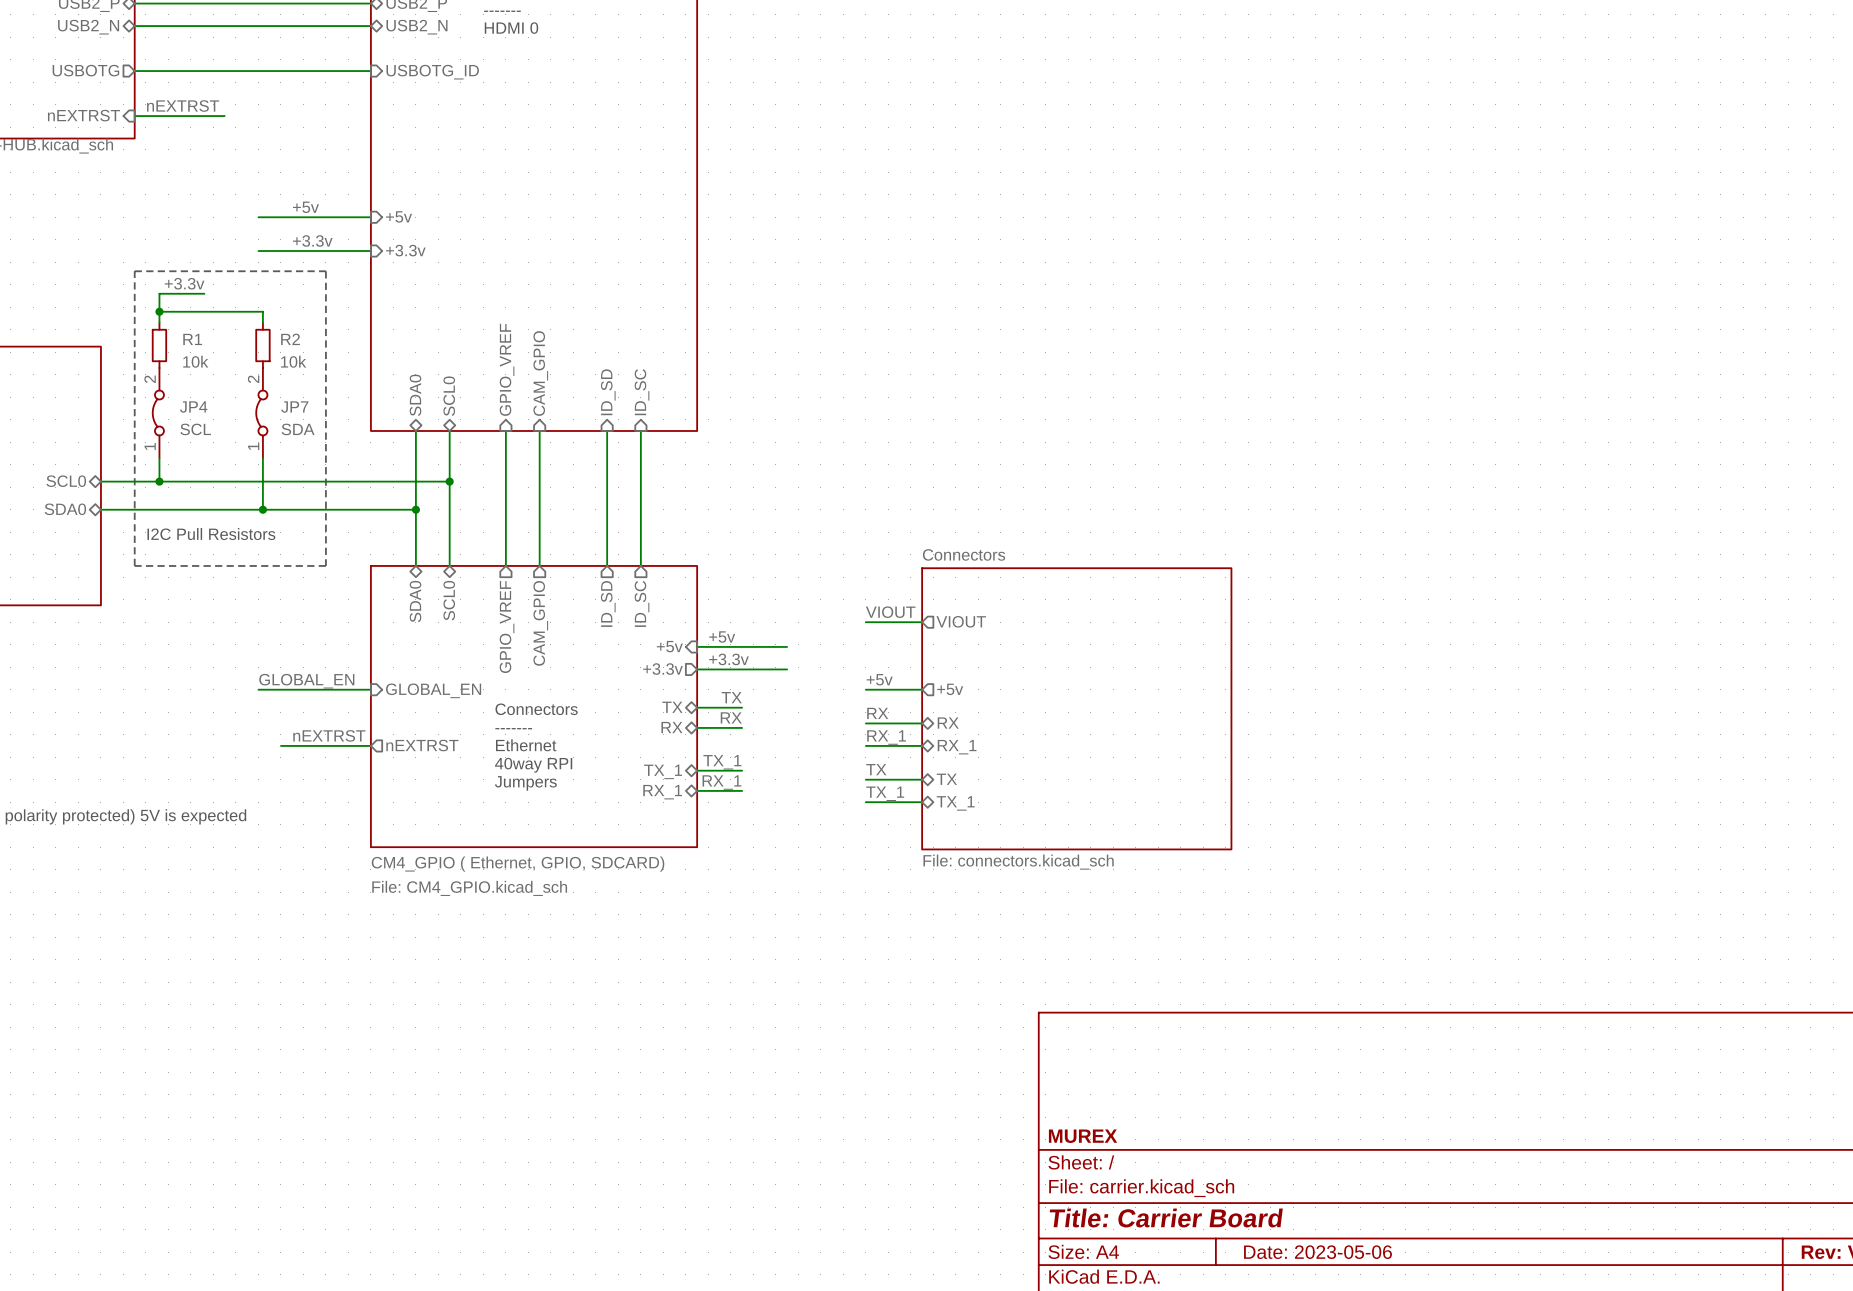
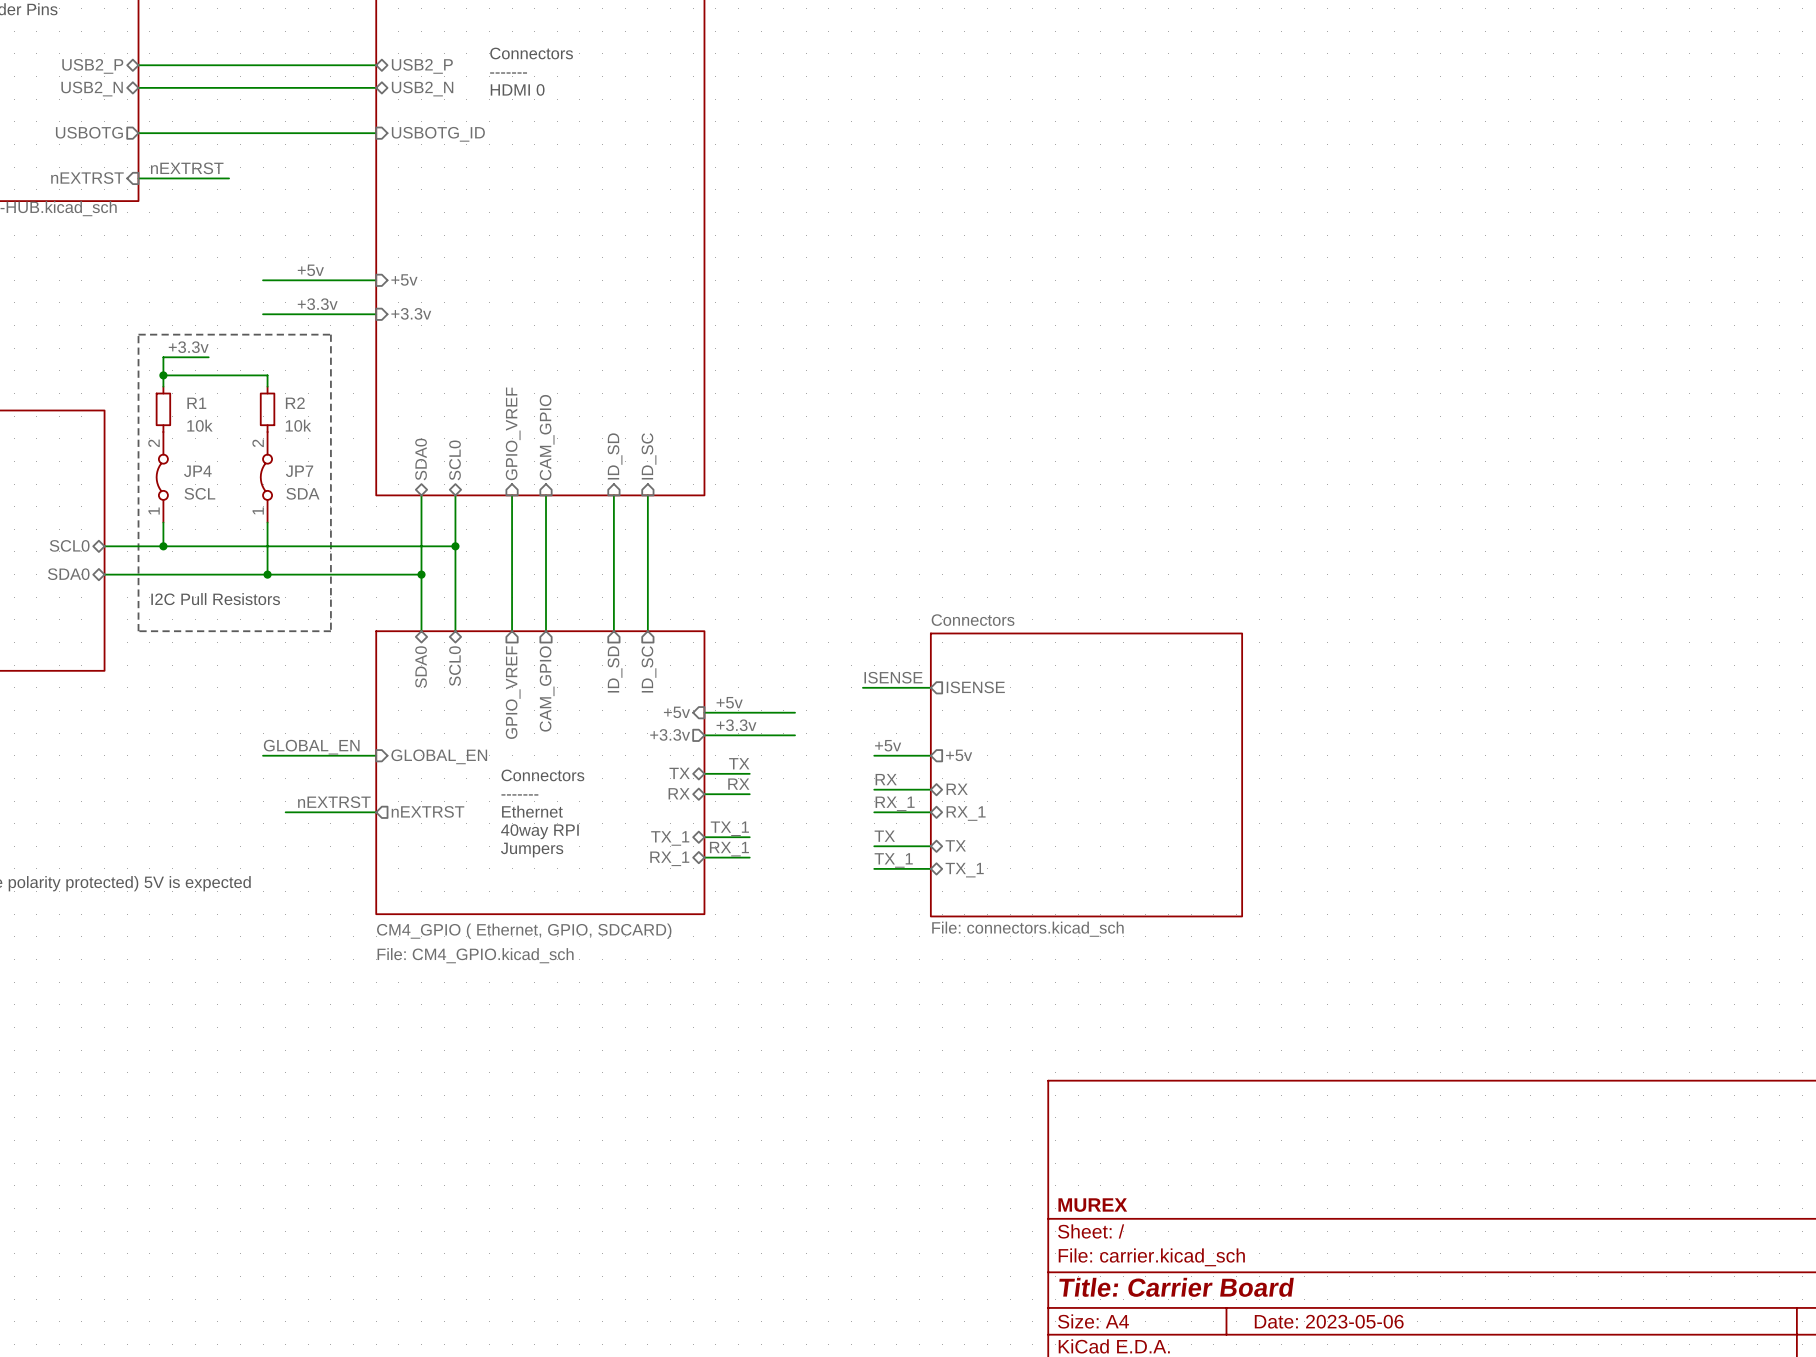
label: none -> ISENSE (893, 677)
label: VIOUT (890, 612) -> none
sheet pin: VIOUT (961, 621) -> ISENSE (975, 687)
wire: none -> (862, 687) (874, 687)

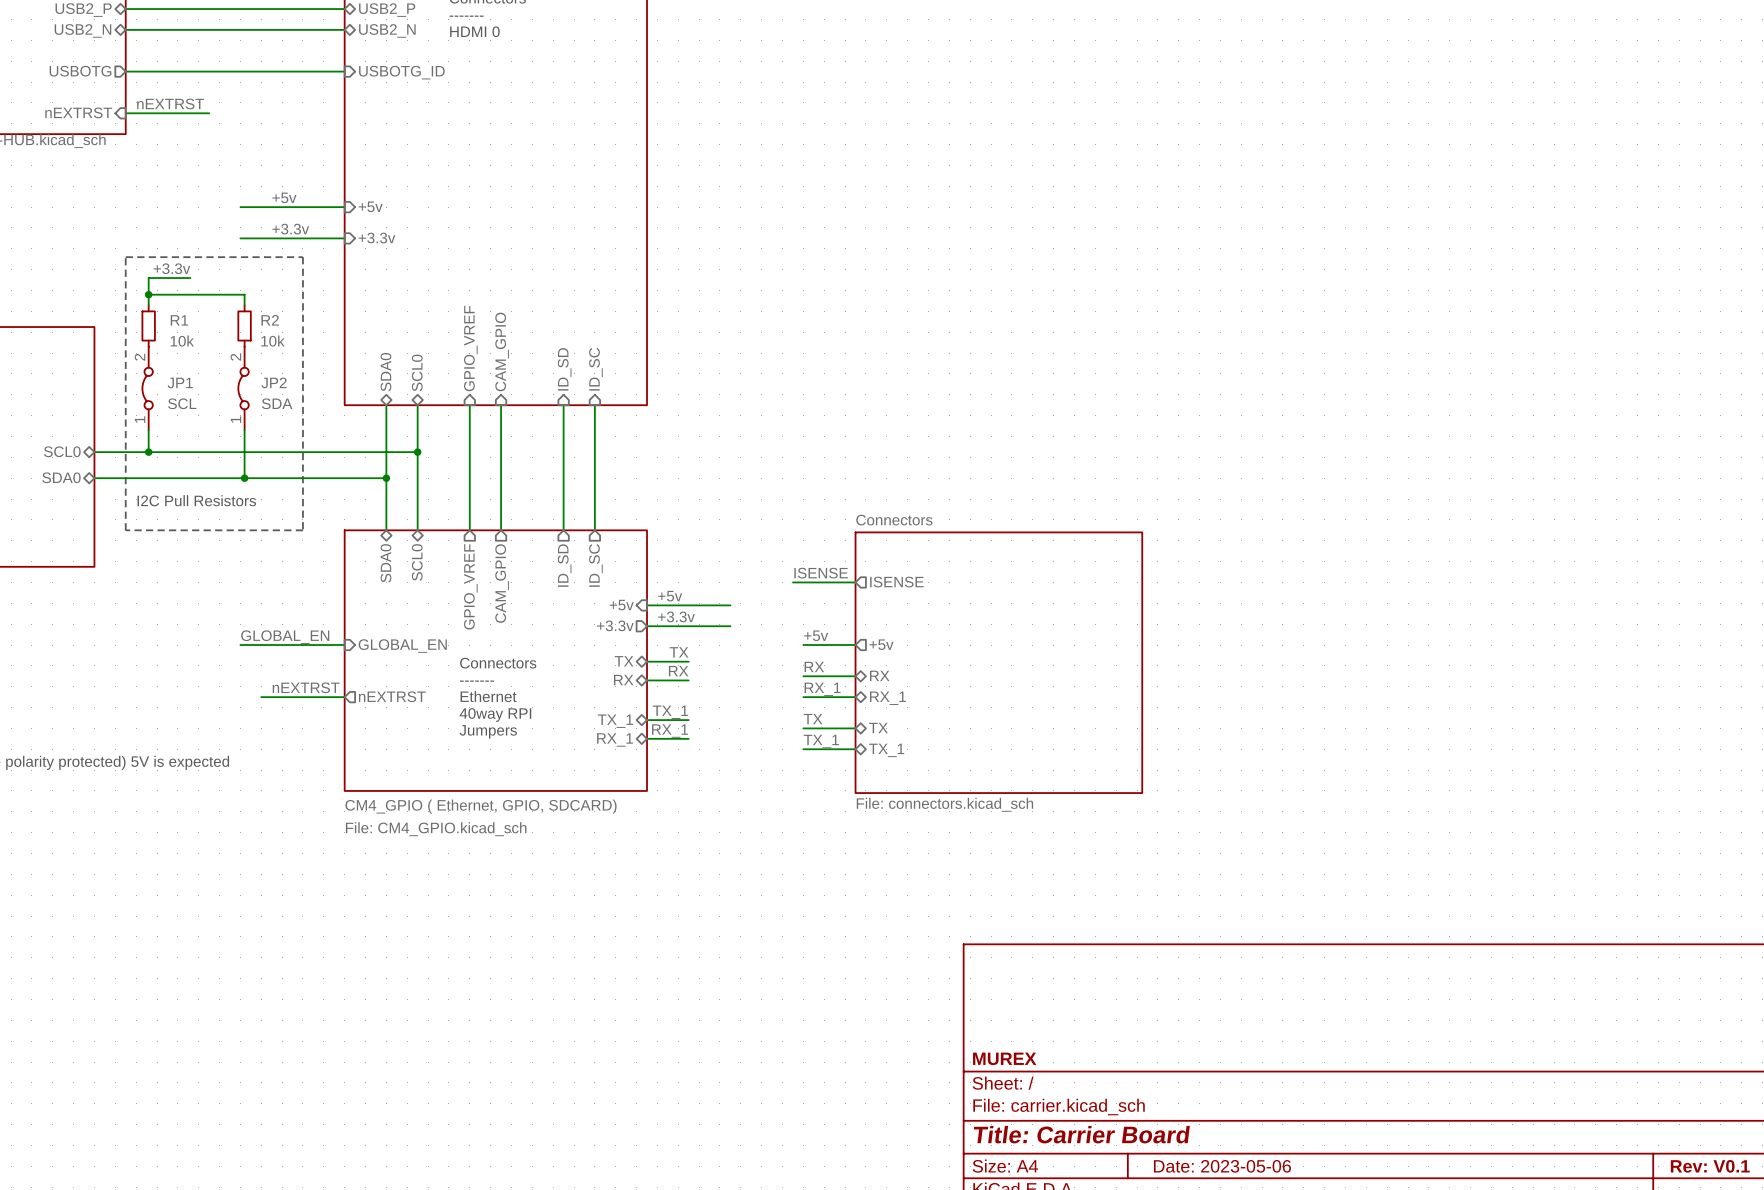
JP4 name: JP4 (197, 471) -> JP1 (180, 383)
JP7 name: JP7 (299, 471) -> JP2 (274, 382)

